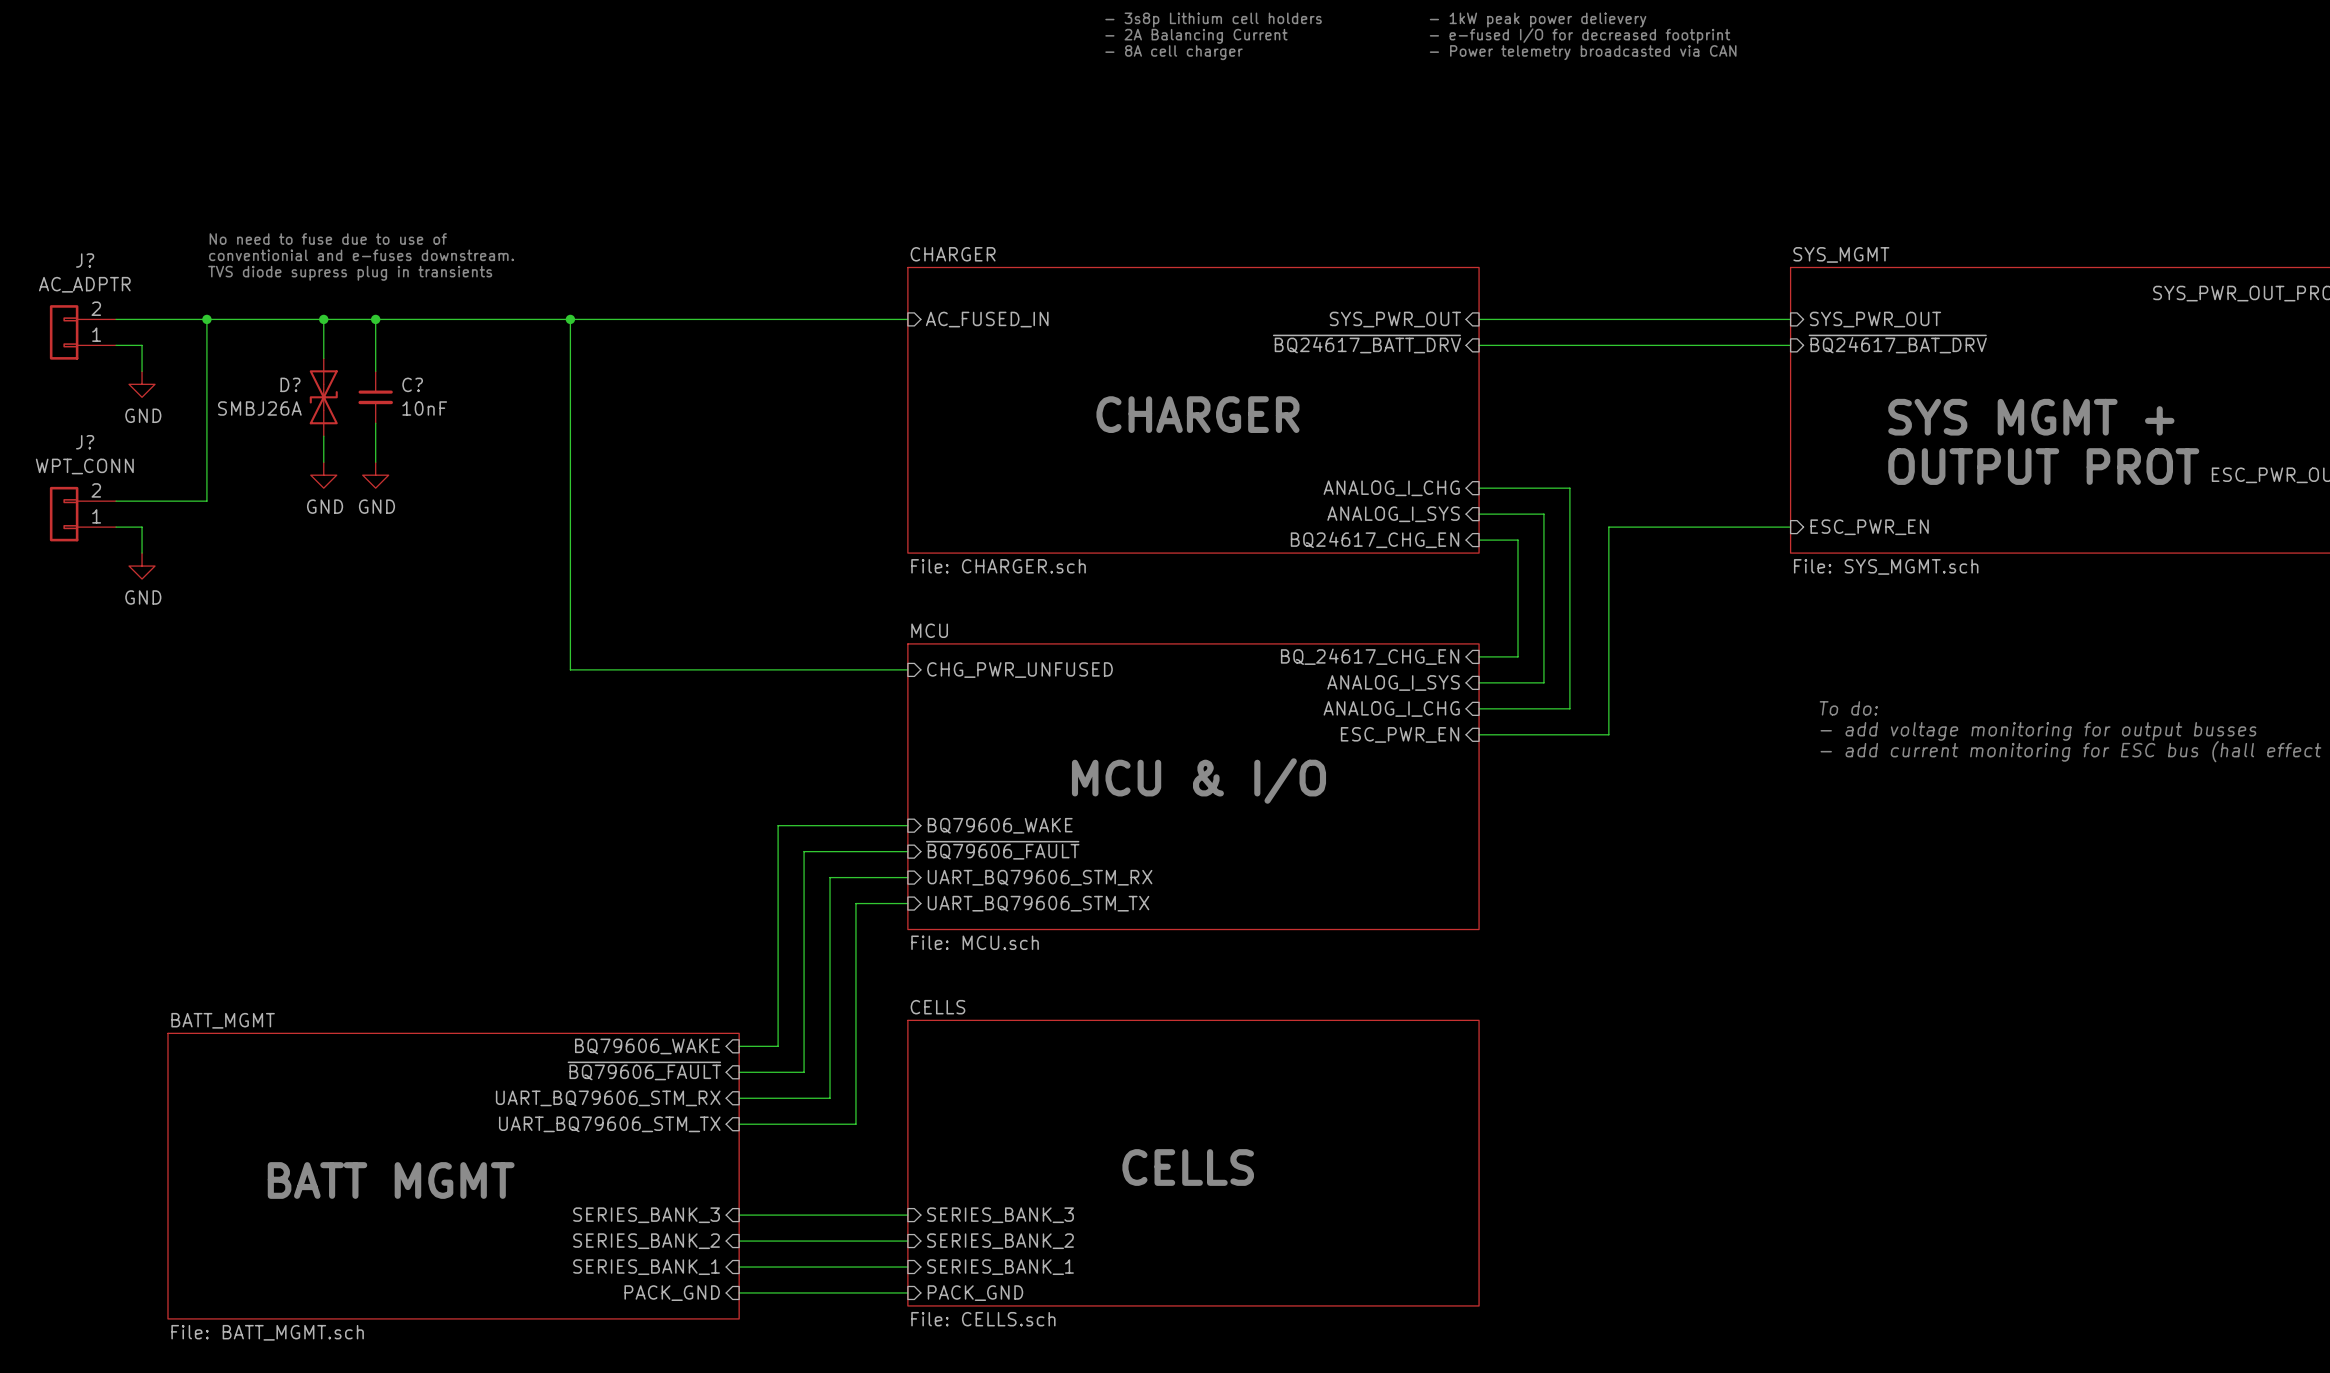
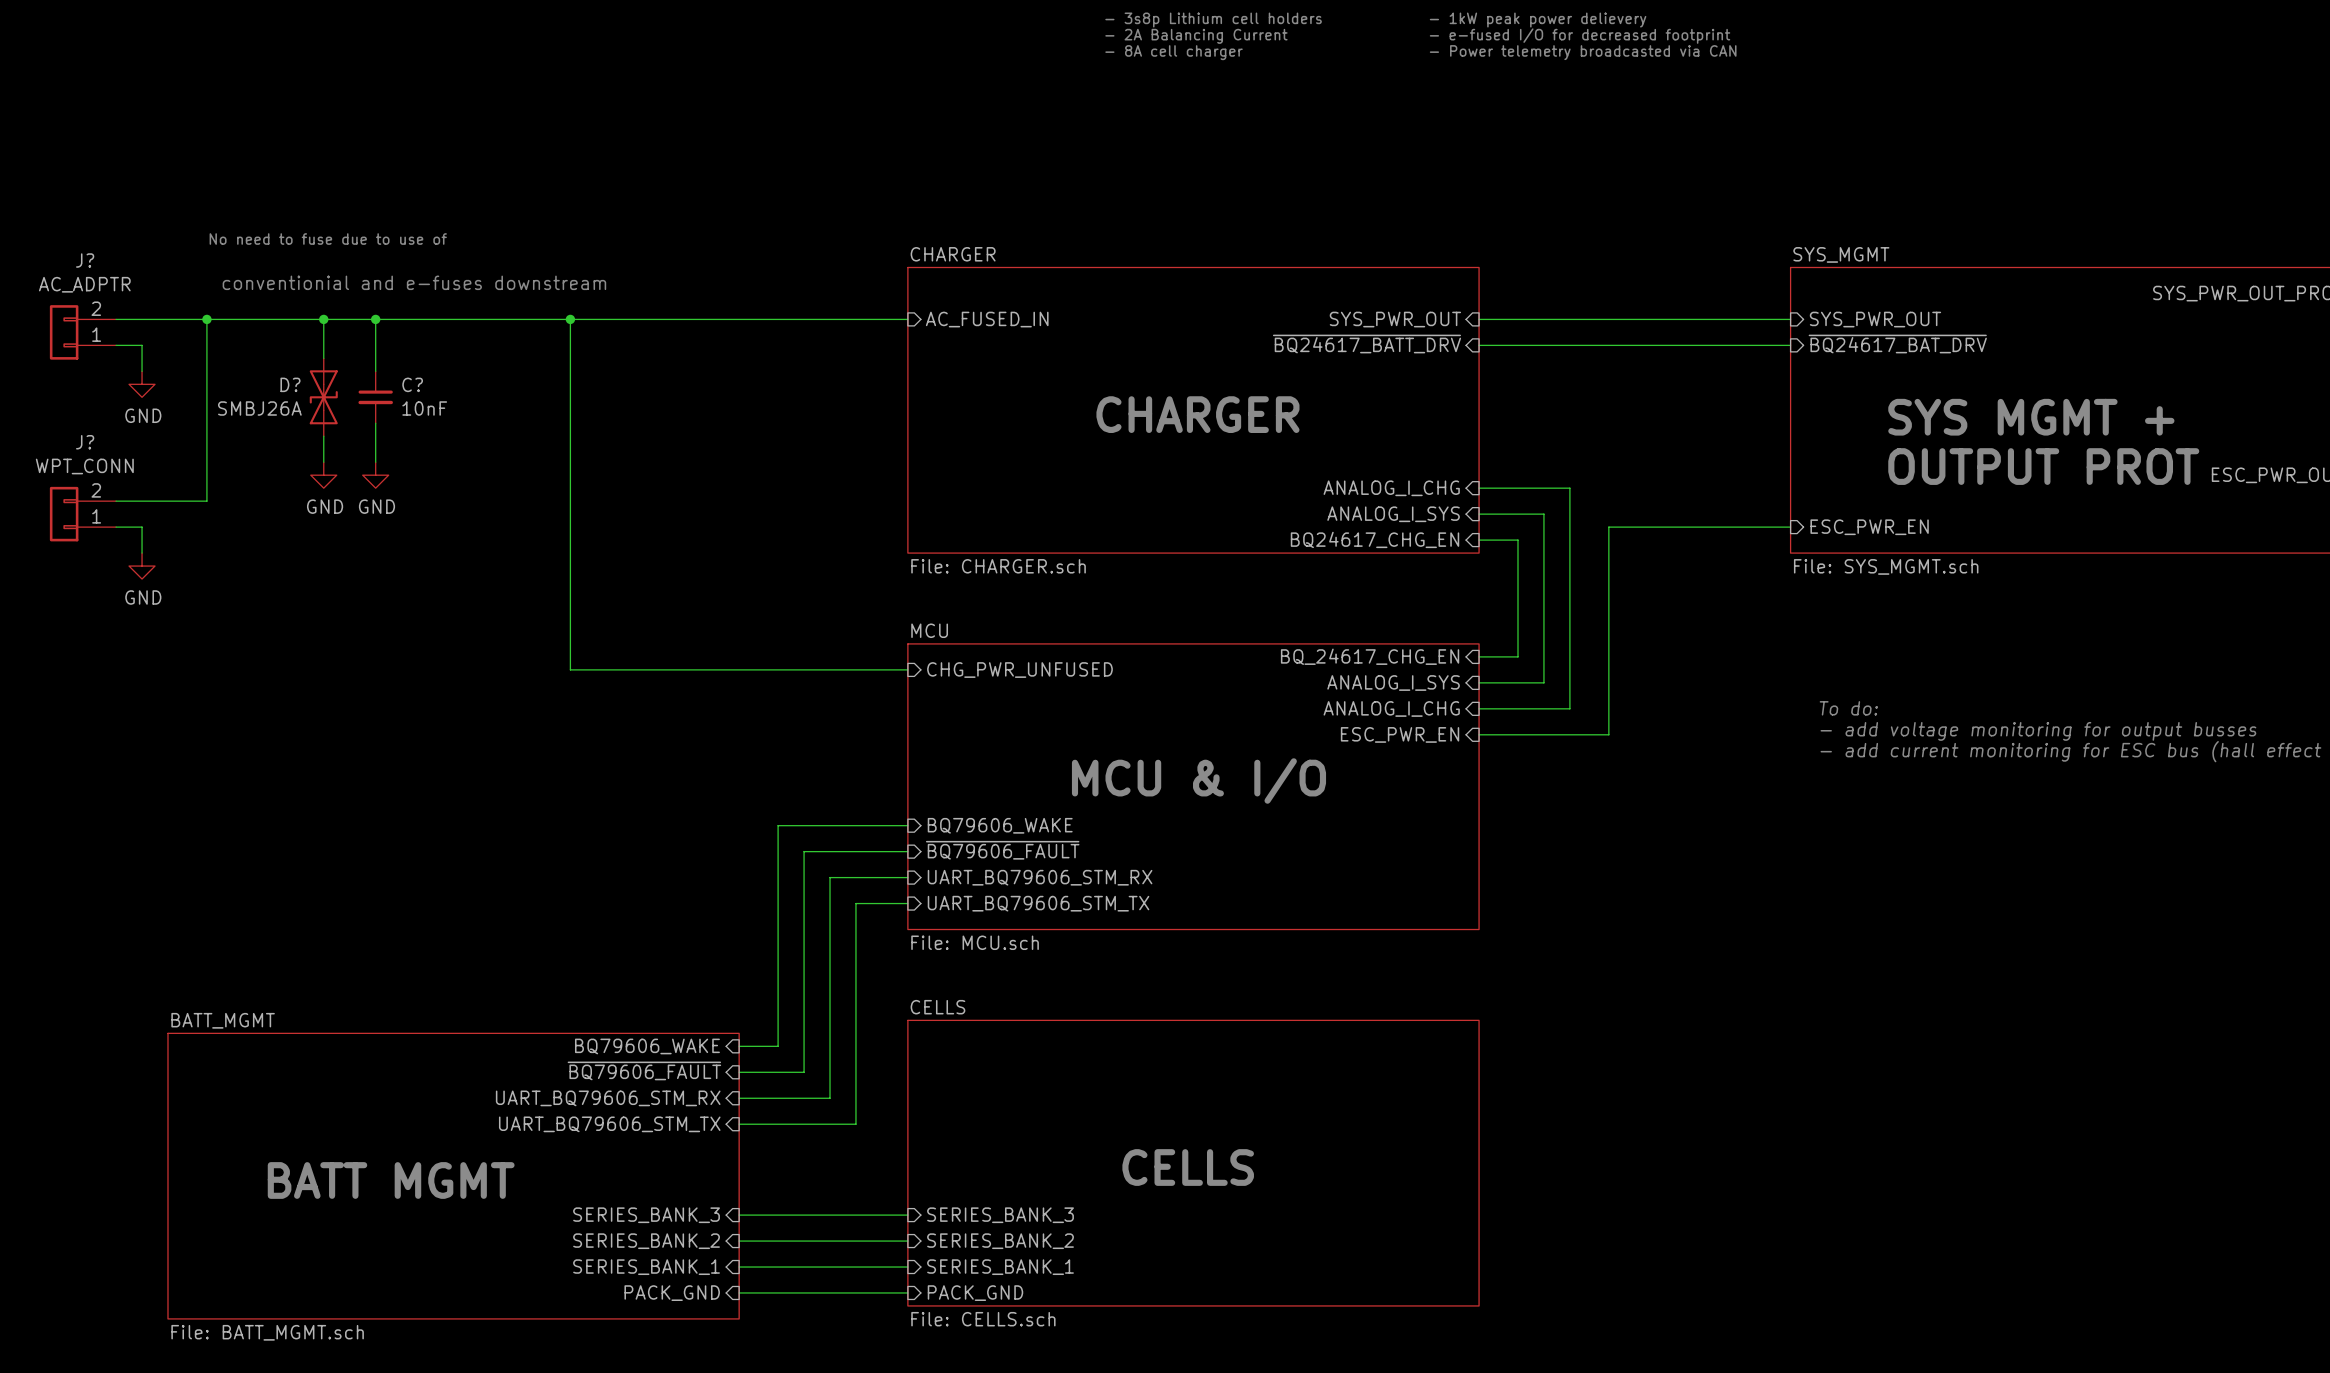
text: conventionial and e-fuses downstream. (361, 255) -> none
text: TVS diode supress plug in transients (350, 273) -> none
text: none -> conventionial and e-fuses downstream (414, 282)

